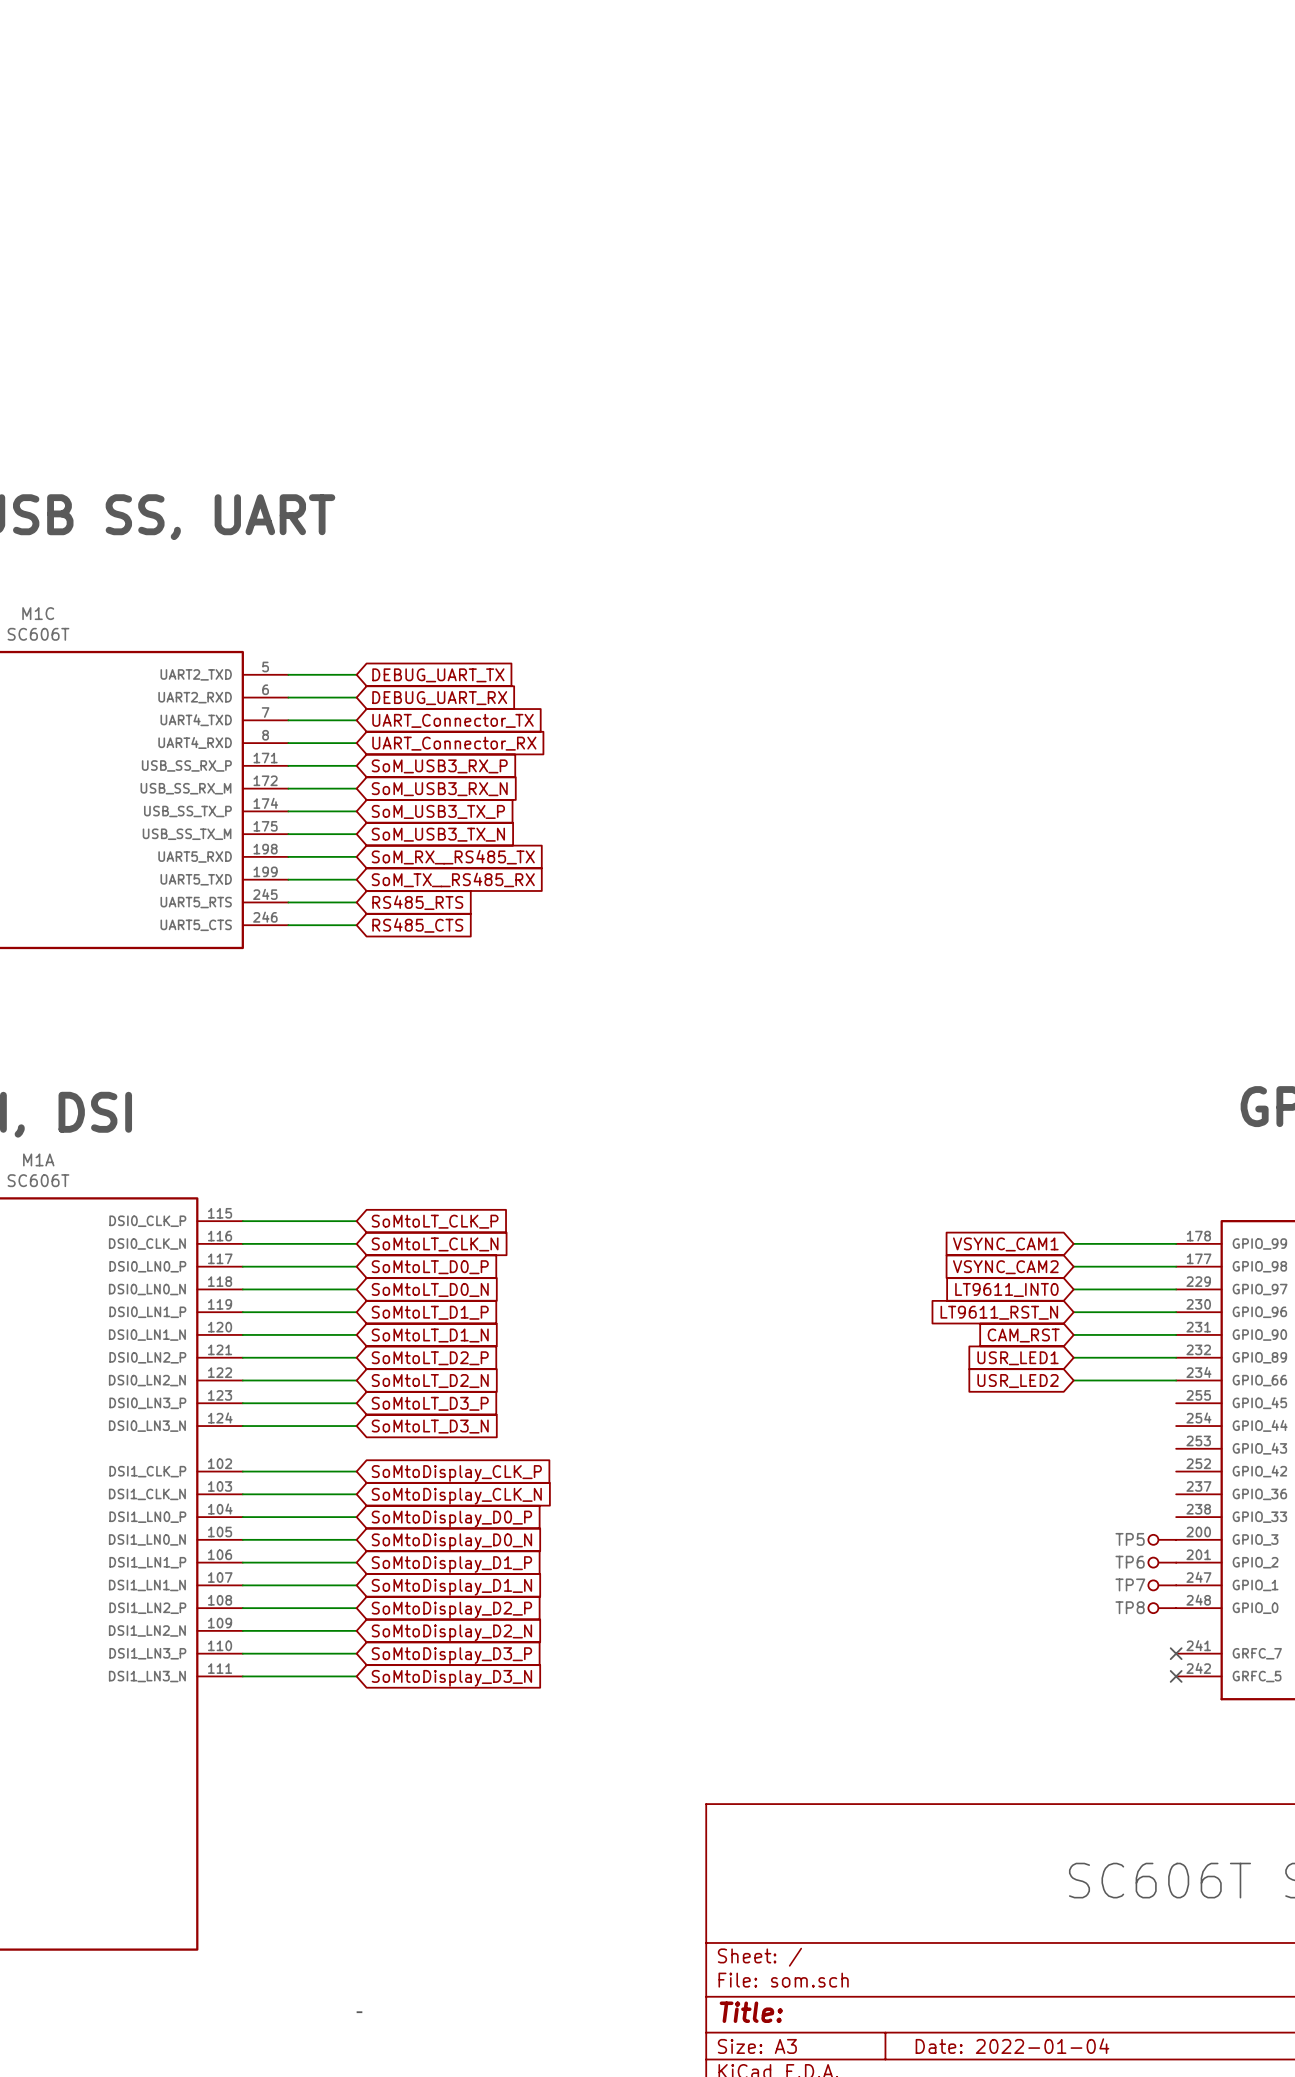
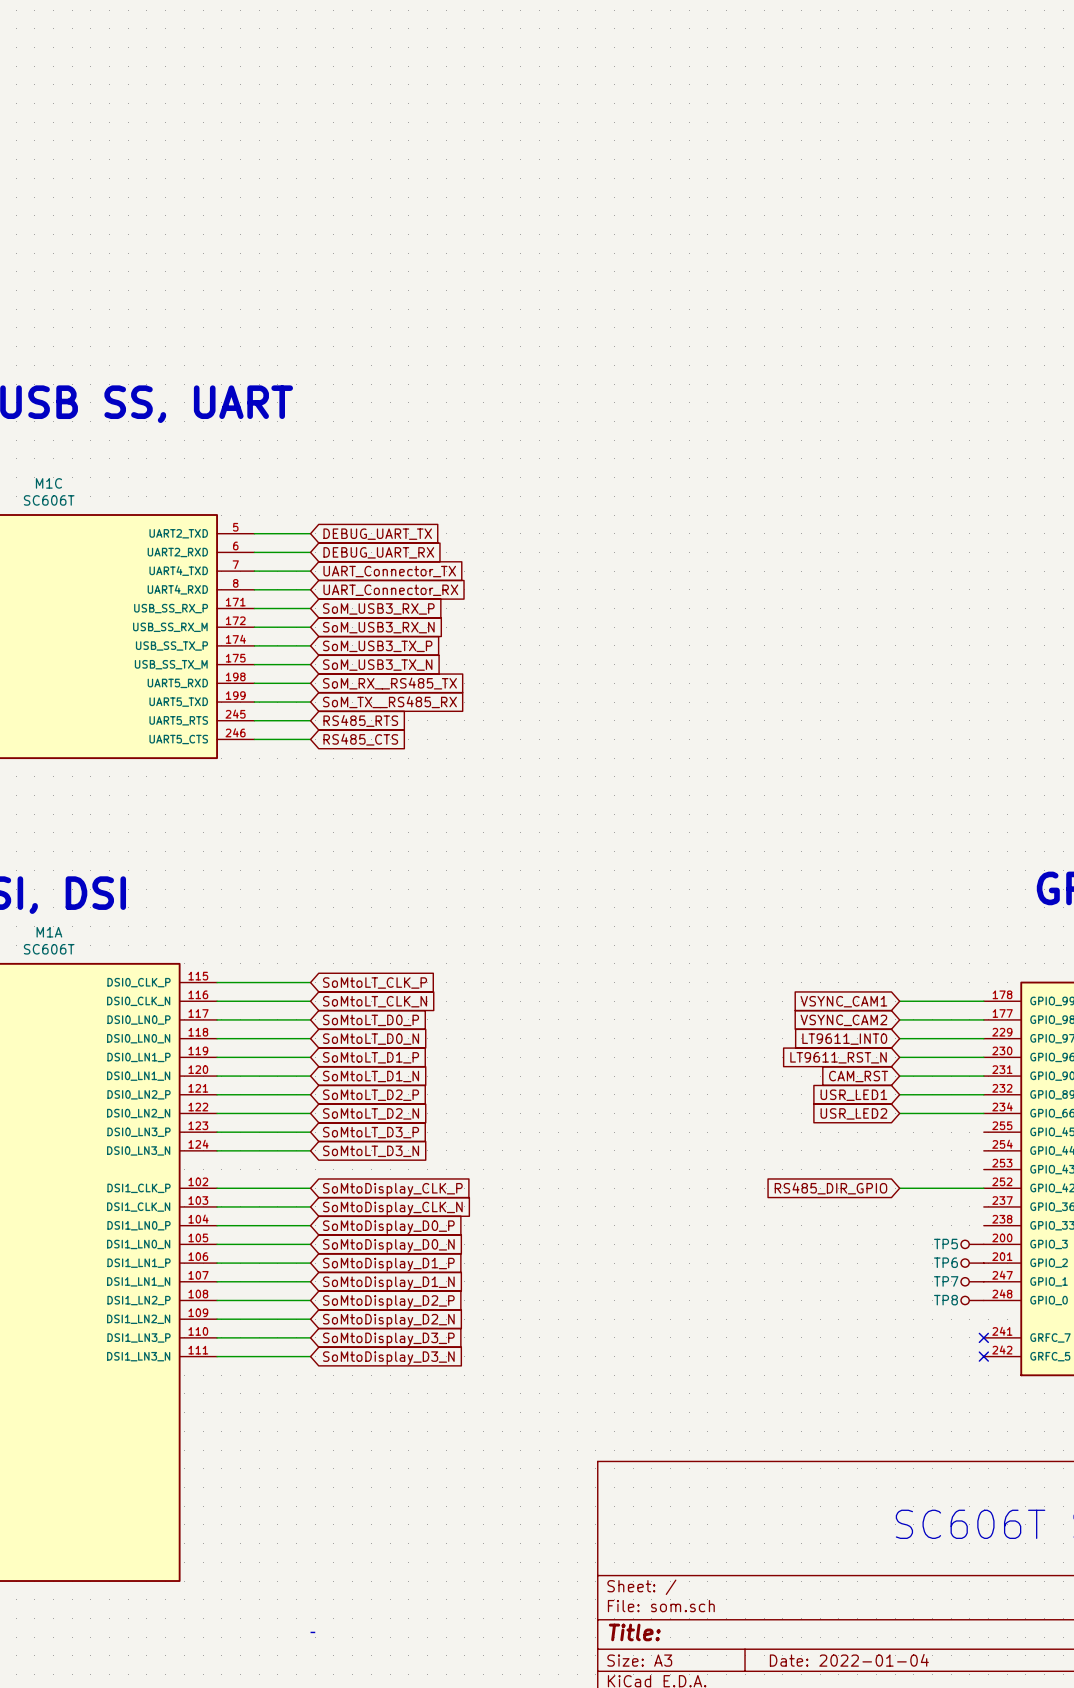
global label: none -> RS485_DIR_GPIO (830, 1188)
wire: none -> (899, 1188) (983, 1188)

